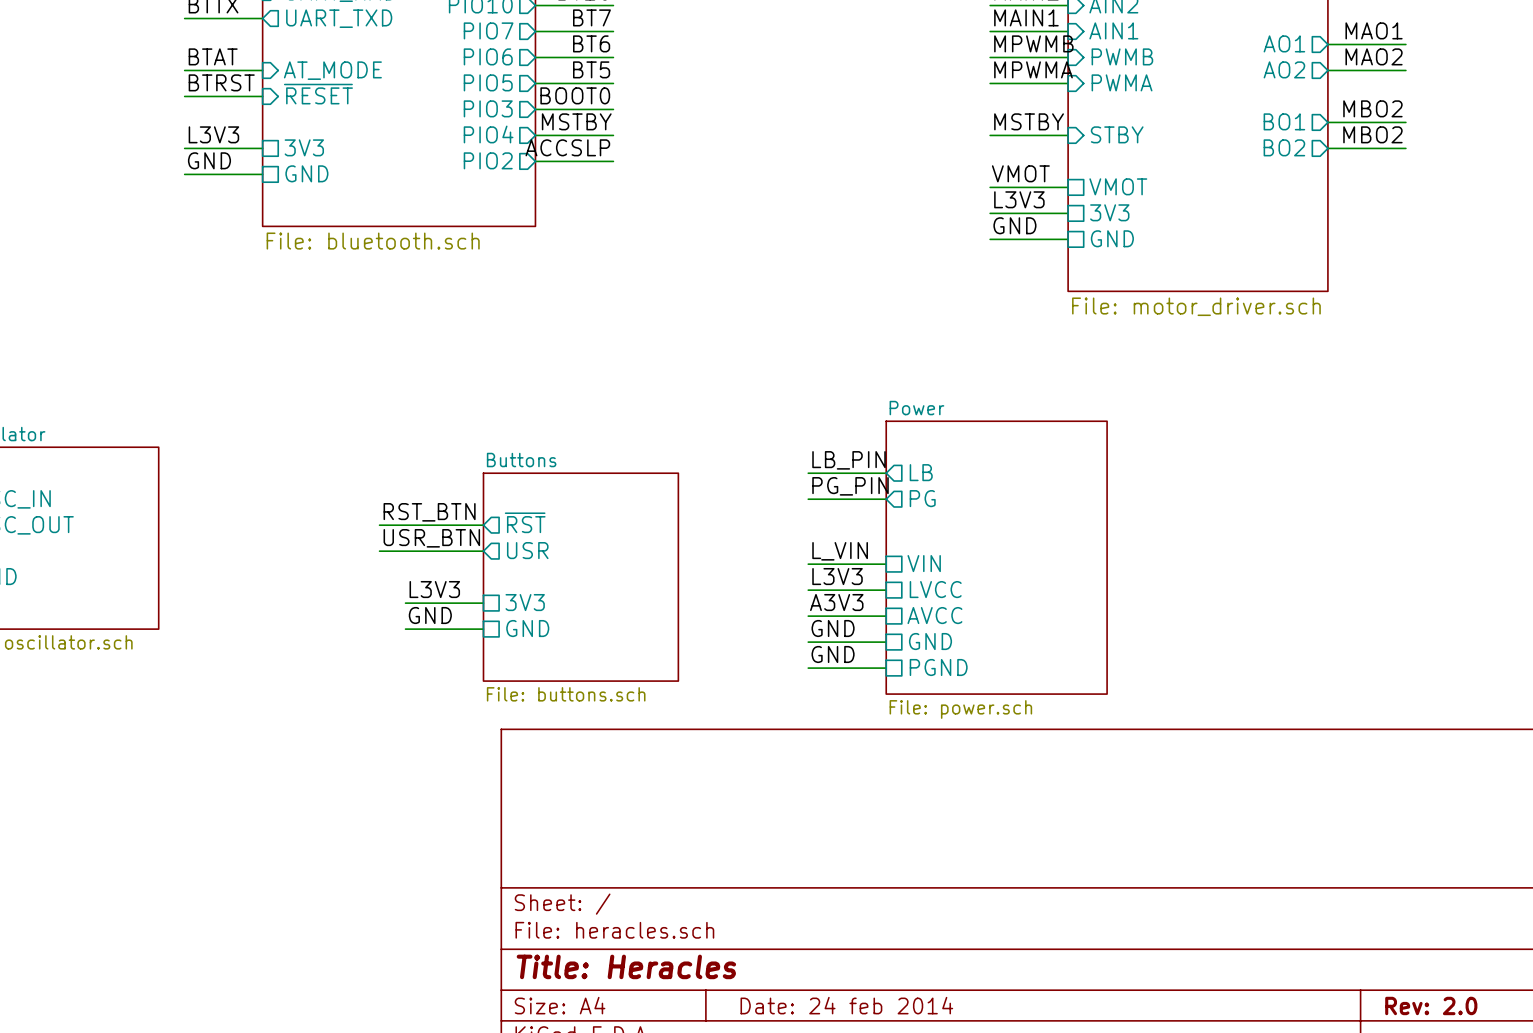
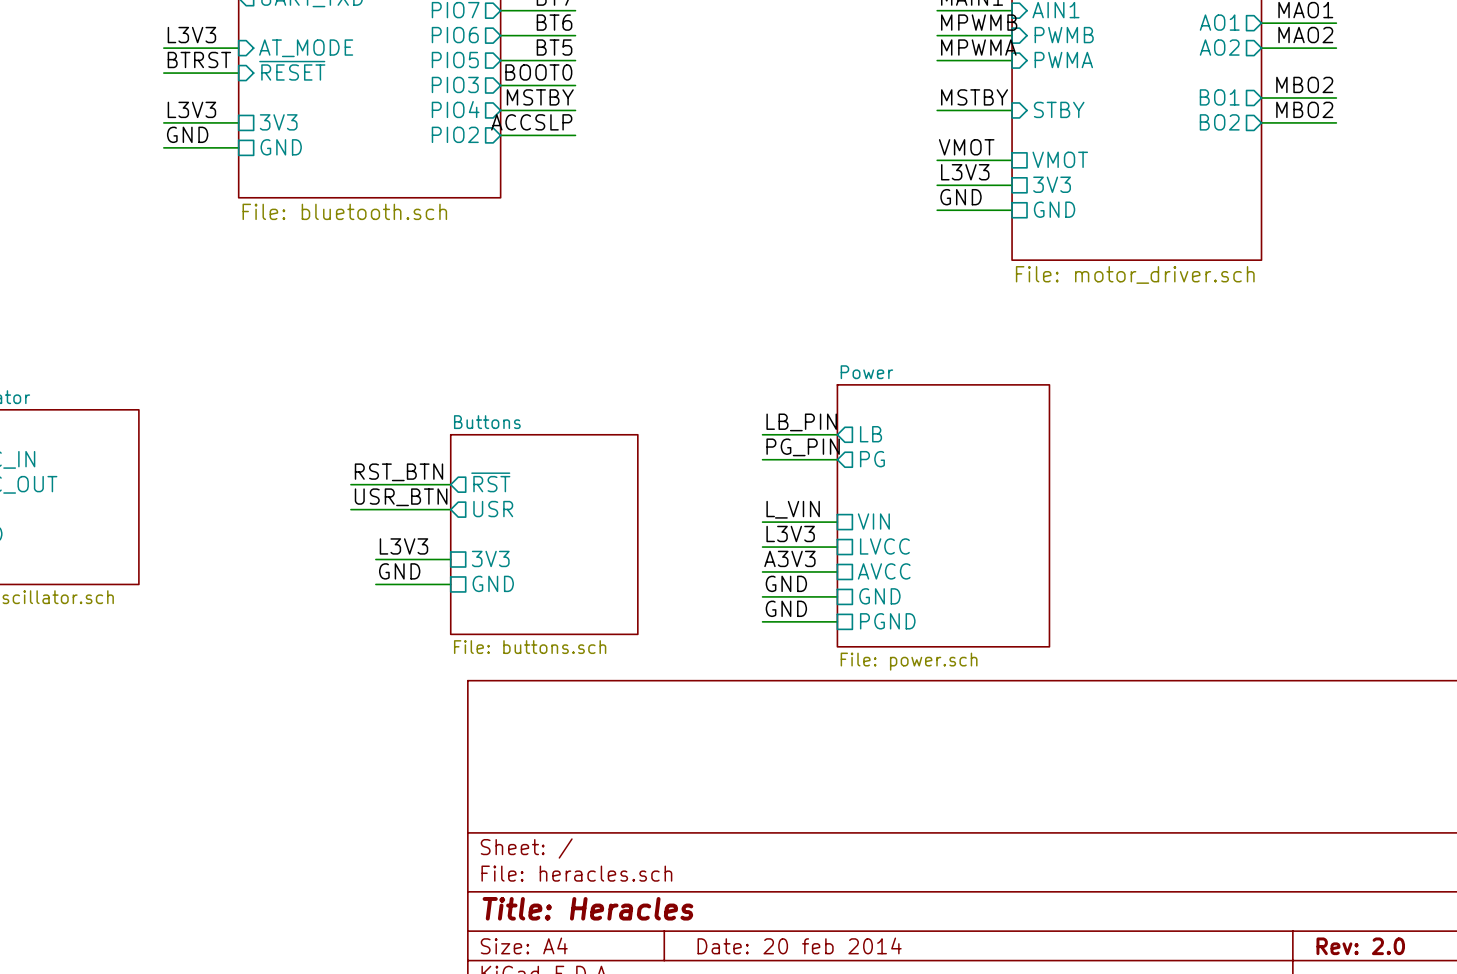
label: BTAT (213, 56) -> L3V3 (191, 35)
title block: Date: 24 feb 2014 (846, 1005) -> Date: 20 feb 2014 (799, 945)

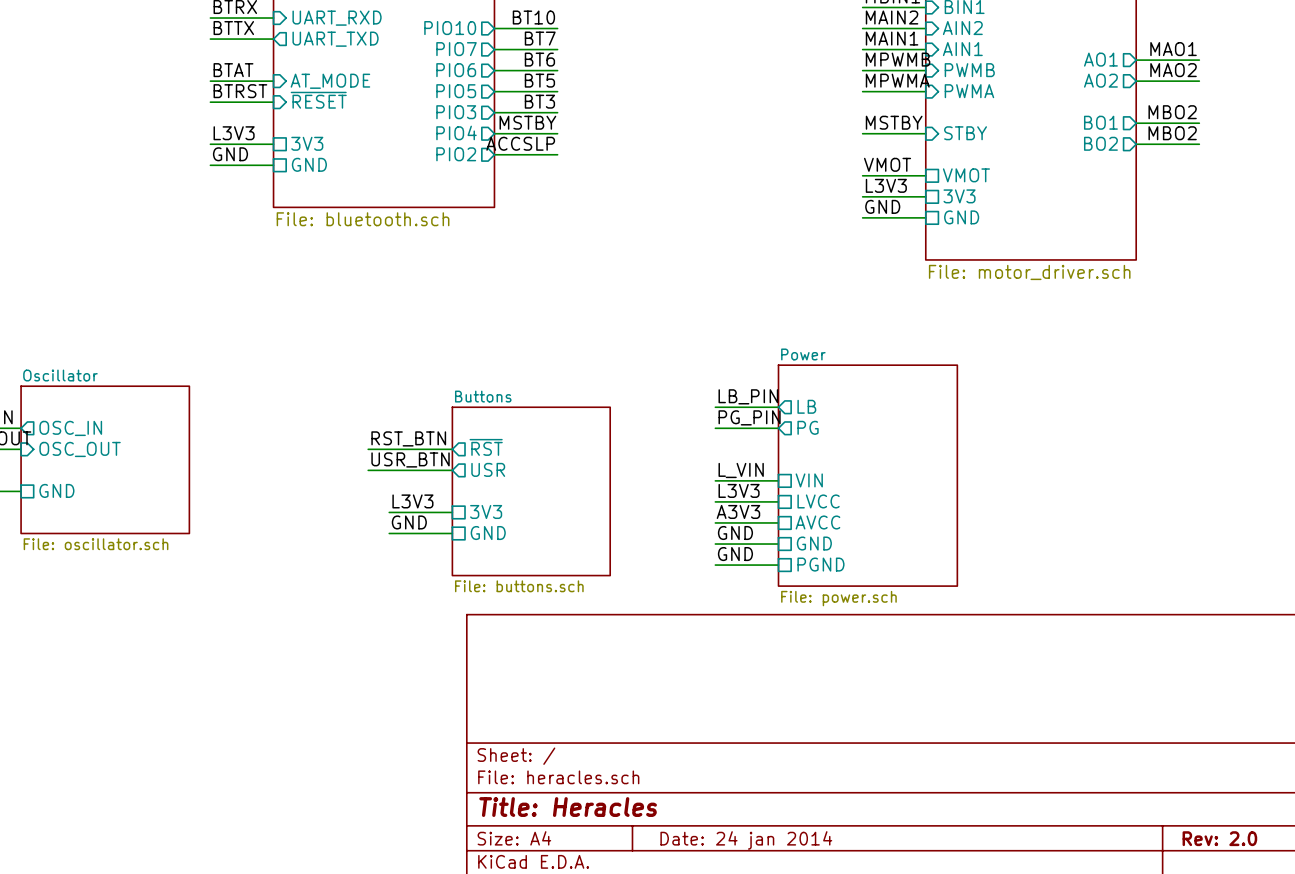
label: L3V3 (191, 35) -> BTAT (233, 70)
label: BOOT0 (538, 72) -> BT3 (539, 101)
title block: Date: 20 feb 2014 (799, 945) -> Date: 24 jan 2014 (746, 840)

